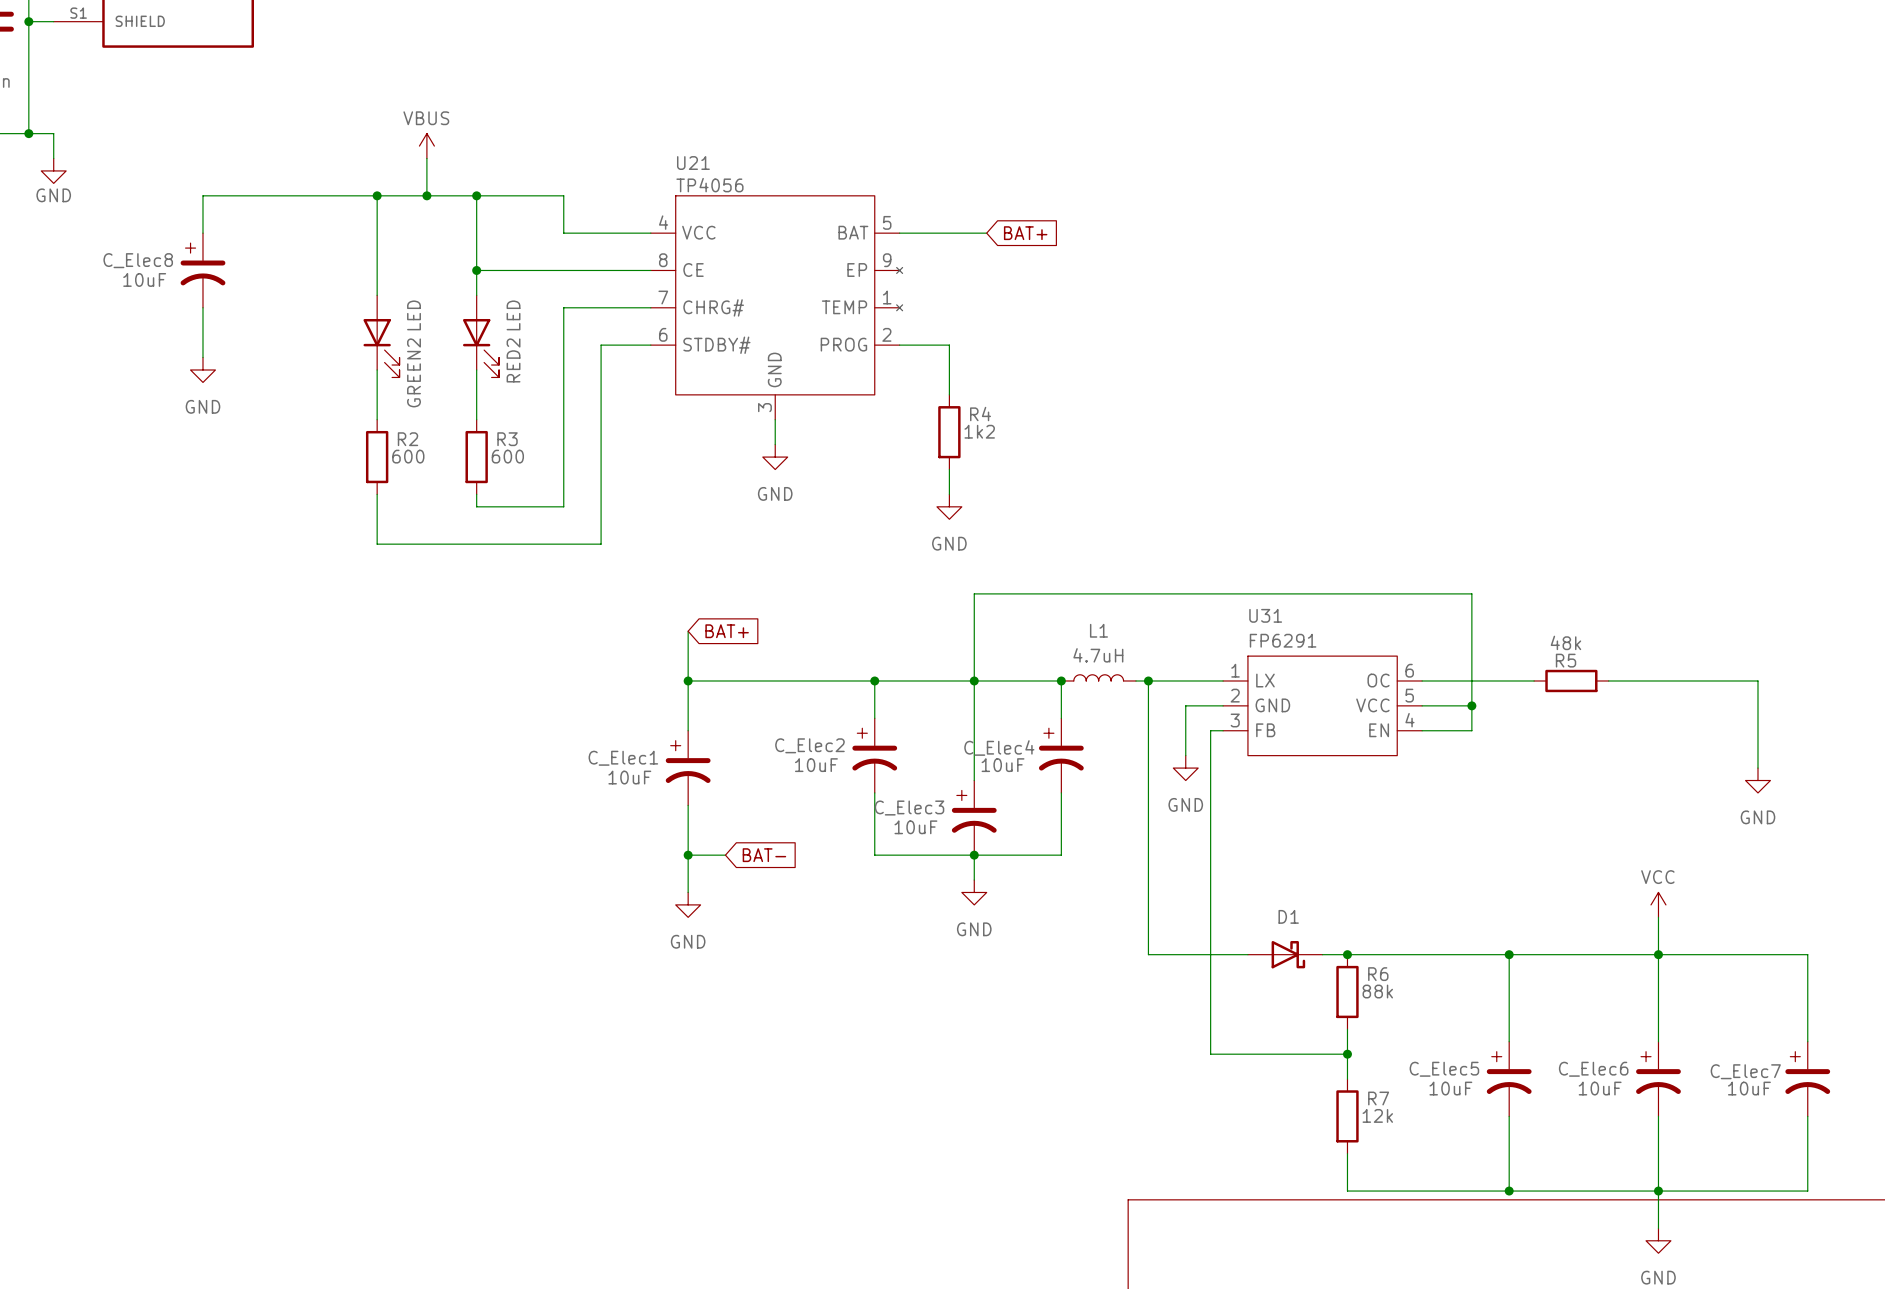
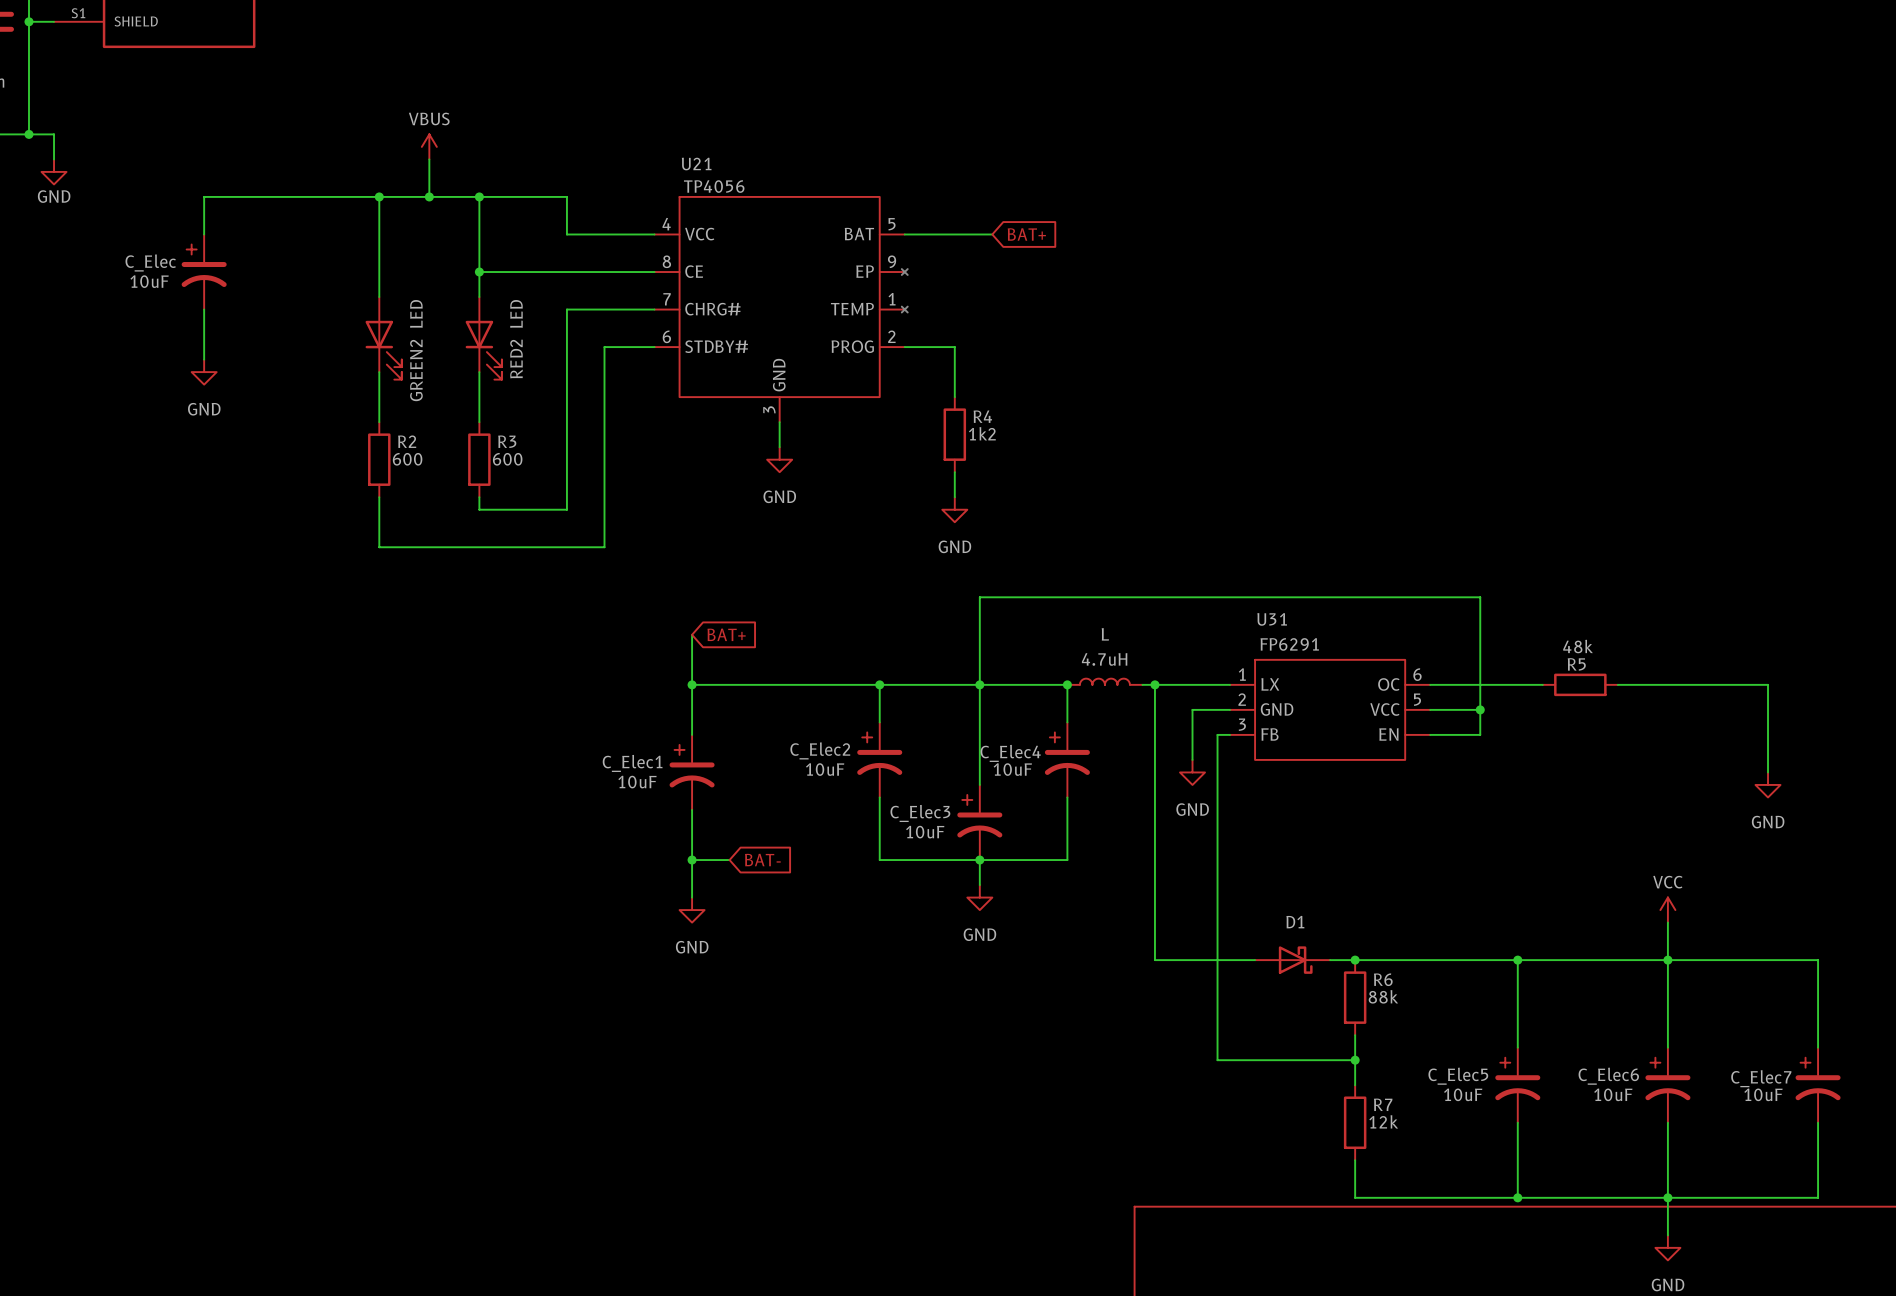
C_Elec8 name: C_Elec8 (138, 260) -> C_Elec (150, 263)
L1 name: L1 (1098, 630) -> L (1105, 634)
U31 pin number: 4 (1409, 720) -> none

